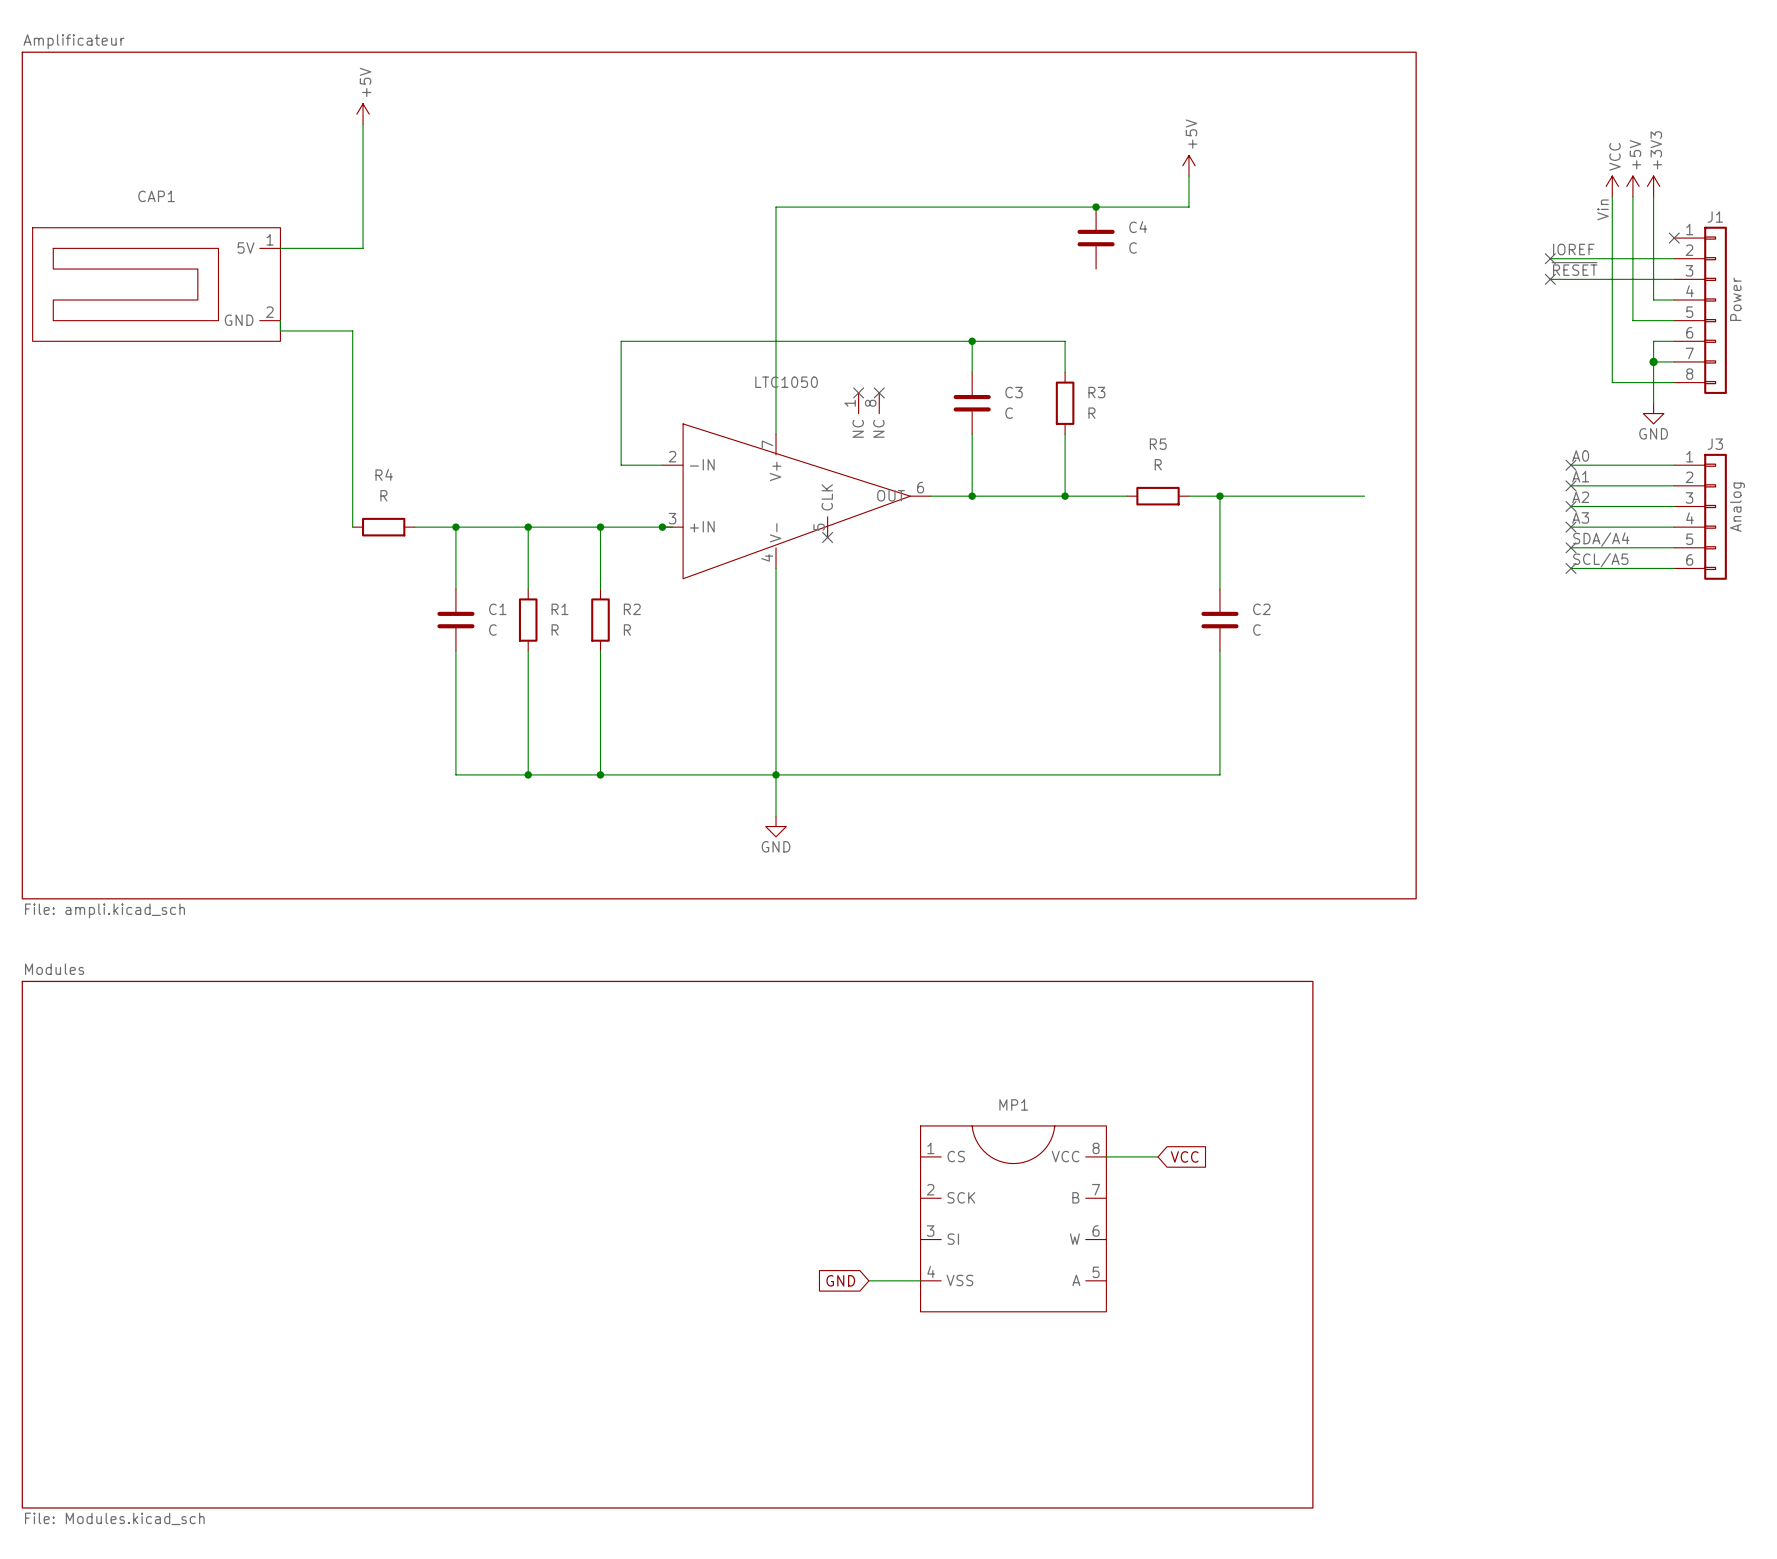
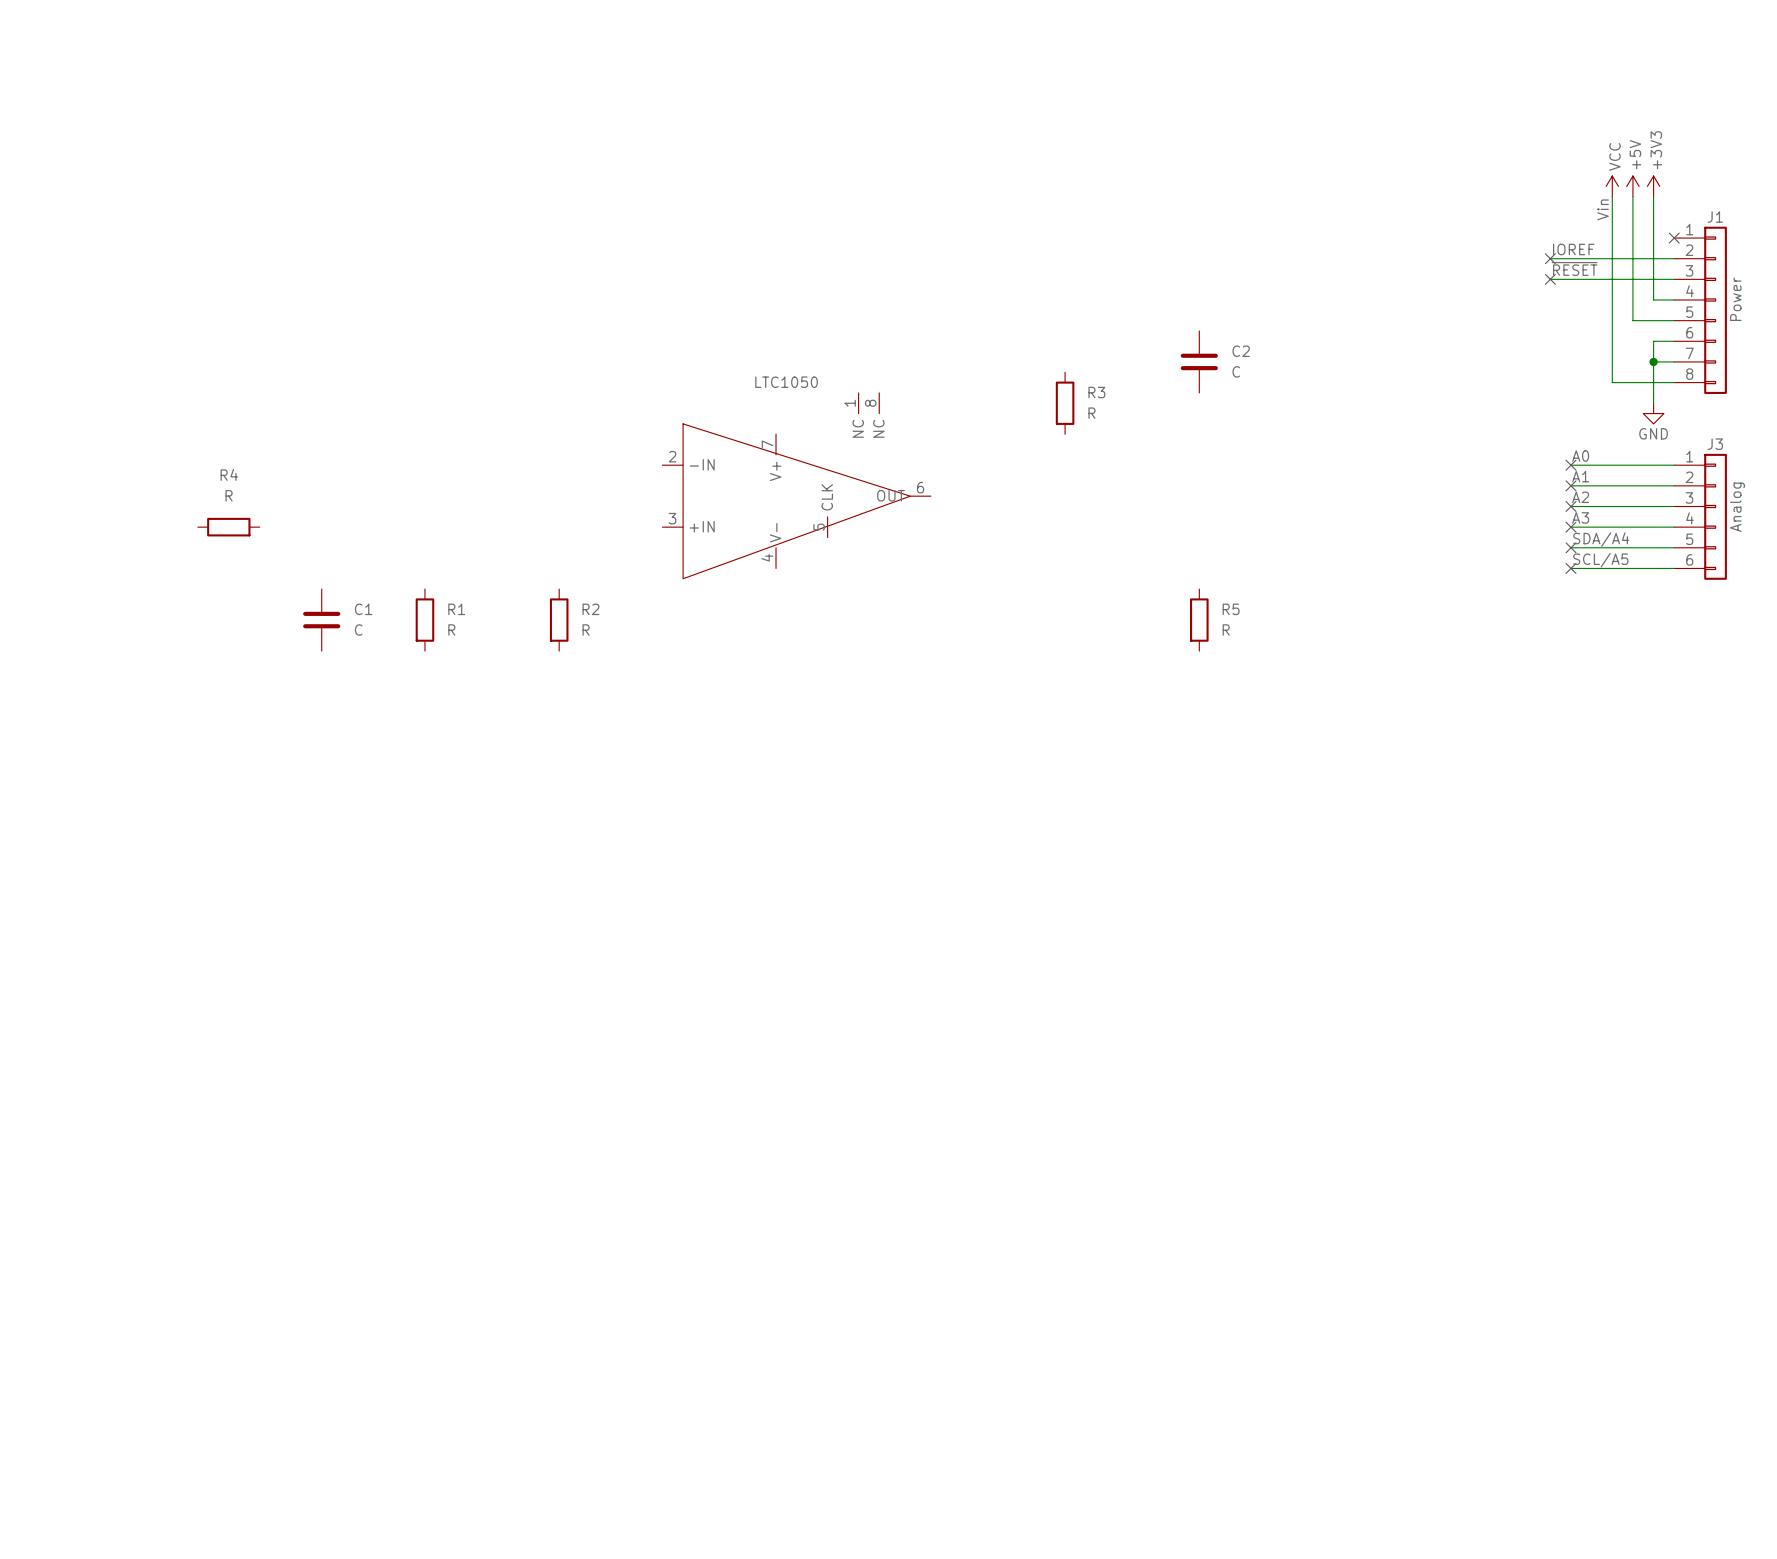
power symbol: +5V (363, 114) -> none
wire: (363, 124) (363, 248) (280, 248) -> none
power symbol: +5V (1188, 165) -> none
wire: (1188, 176) (1188, 207) (776, 207) (776, 434) -> none
junction: (1096, 207) -> none
C4: C (1096, 238) -> none
CAP1: (156, 284) -> none
wire: (280, 320) (280, 330) (352, 330) (352, 527) -> none
wire: (972, 341) (972, 372) -> none
junction: (972, 341) -> none
wire: (1065, 372) (1065, 341) (621, 341) (621, 465) (662, 465) -> none
no-connect mark: (858, 392) -> none
no-connect mark: (879, 392) -> none
C3: C (972, 403) -> none
wire: (972, 434) (972, 496) -> none
wire: (1065, 434) (1065, 496) -> none
R5 name position: R5 (1158, 444) -> R5 (1231, 609)
sheet Amplificateur: File: ampli.kicad_sch (719, 475) -> none
wire: (930, 496) (1127, 496) -> none
junction: (972, 496) -> none
junction: (1065, 496) -> none
R5 rotation: 0° (1158, 496) -> 90° clockwise (1199, 620)
R5 position: (1158, 496) -> (1199, 620)
wire: (1188, 496) (1364, 496) -> none
wire: (1219, 496) (1219, 589) -> none
junction: (1219, 496) -> none
R4 position: (383, 527) -> (228, 527)
wire: (414, 527) (672, 527) -> none
wire: (455, 527) (455, 589) -> none
junction: (455, 527) -> none
wire: (528, 527) (528, 589) -> none
junction: (528, 527) -> none
wire: (600, 527) (600, 589) -> none
junction: (600, 527) -> none
junction: (662, 527) -> none
no-connect mark: (827, 537) -> none
wire: (776, 568) (776, 816) -> none
C1 position: (455, 620) -> (321, 620)
R1 position: (528, 620) -> (424, 620)
R2 position: (600, 620) -> (559, 620)
C2 position: (1219, 620) -> (1199, 361)
wire: (455, 651) (455, 774) (1219, 774) (1219, 651) -> none
wire: (528, 651) (528, 774) -> none
wire: (600, 651) (600, 774) -> none
junction: (528, 774) -> none
junction: (600, 774) -> none
junction: (776, 774) -> none
power symbol: GND (776, 826) -> none
wire: (1106, 1156) (1158, 1156) -> none
global label: VCC (1184, 1156) -> none
MP1: (1013, 1218) -> none
sheet Modules: File: Modules.kicad_sch (667, 1244) -> none
global label: GND (840, 1280) -> none
wire: (868, 1280) (920, 1280) -> none

